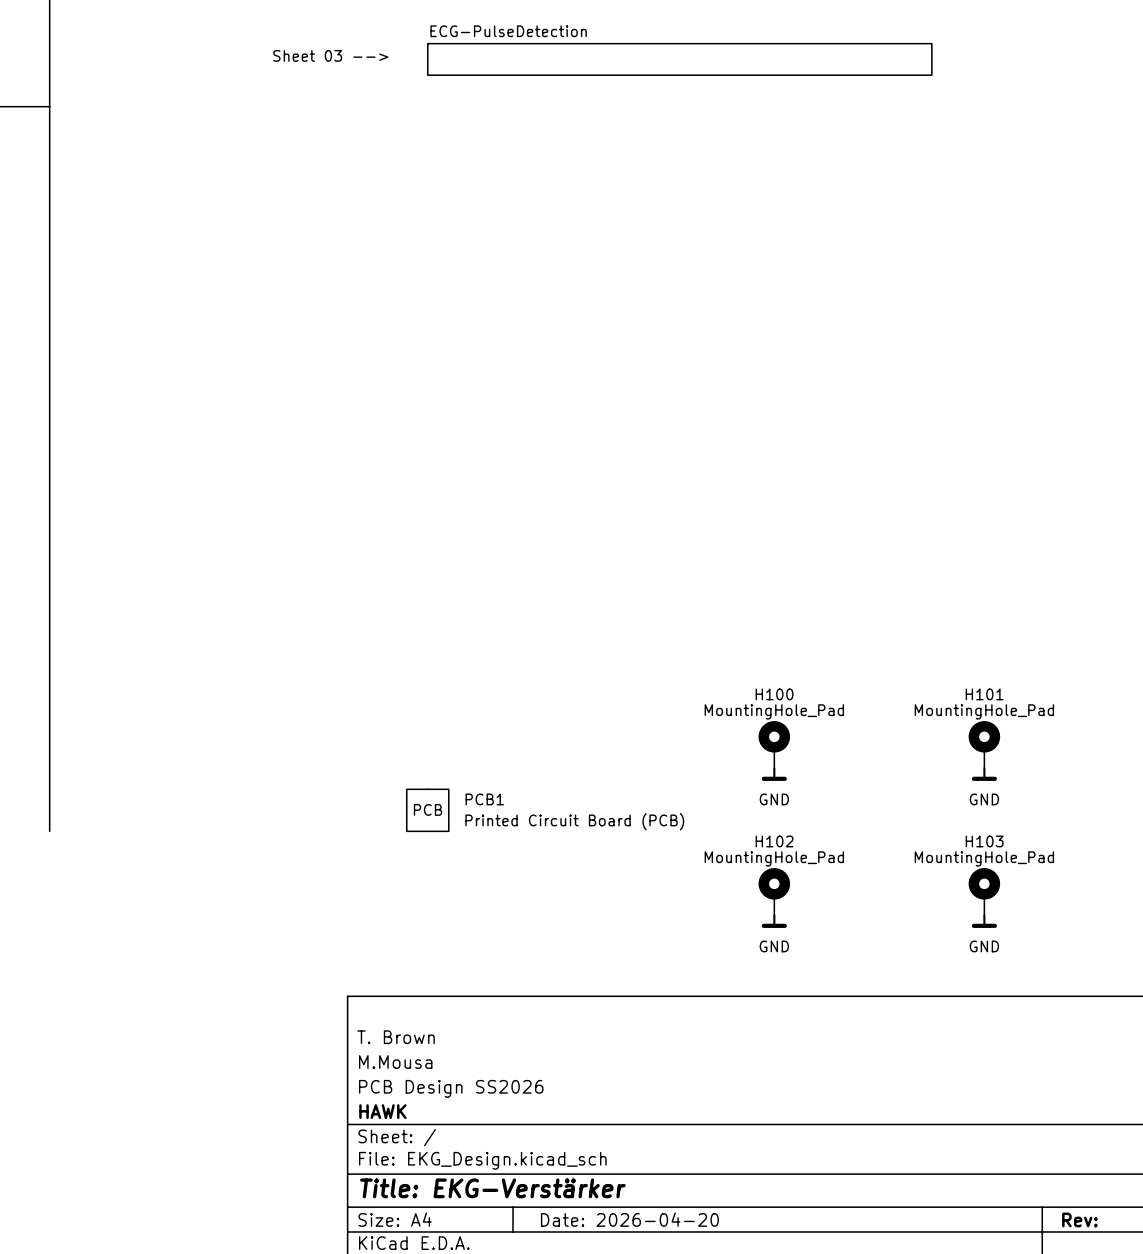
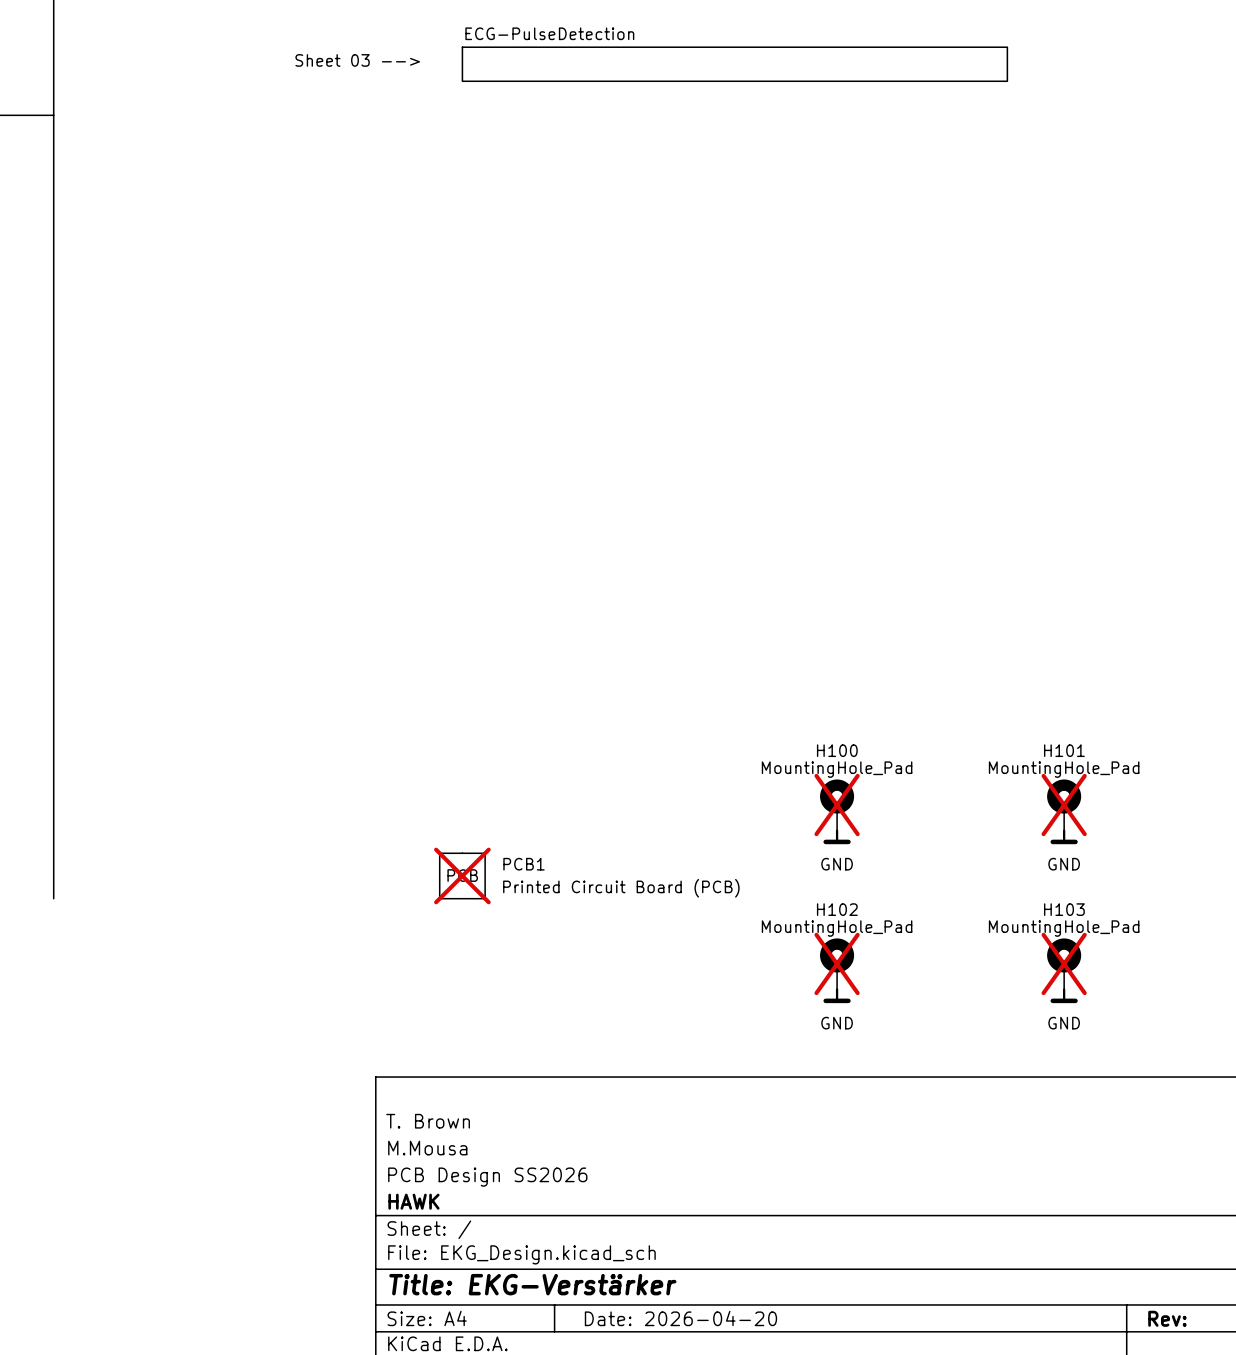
H100 do-not-place cross: none -> (837, 805)
H101 do-not-place cross: none -> (1064, 805)
PCB1 do-not-place cross: none -> (462, 875)
H102 do-not-place cross: none -> (837, 963)
H103 do-not-place cross: none -> (1064, 963)

